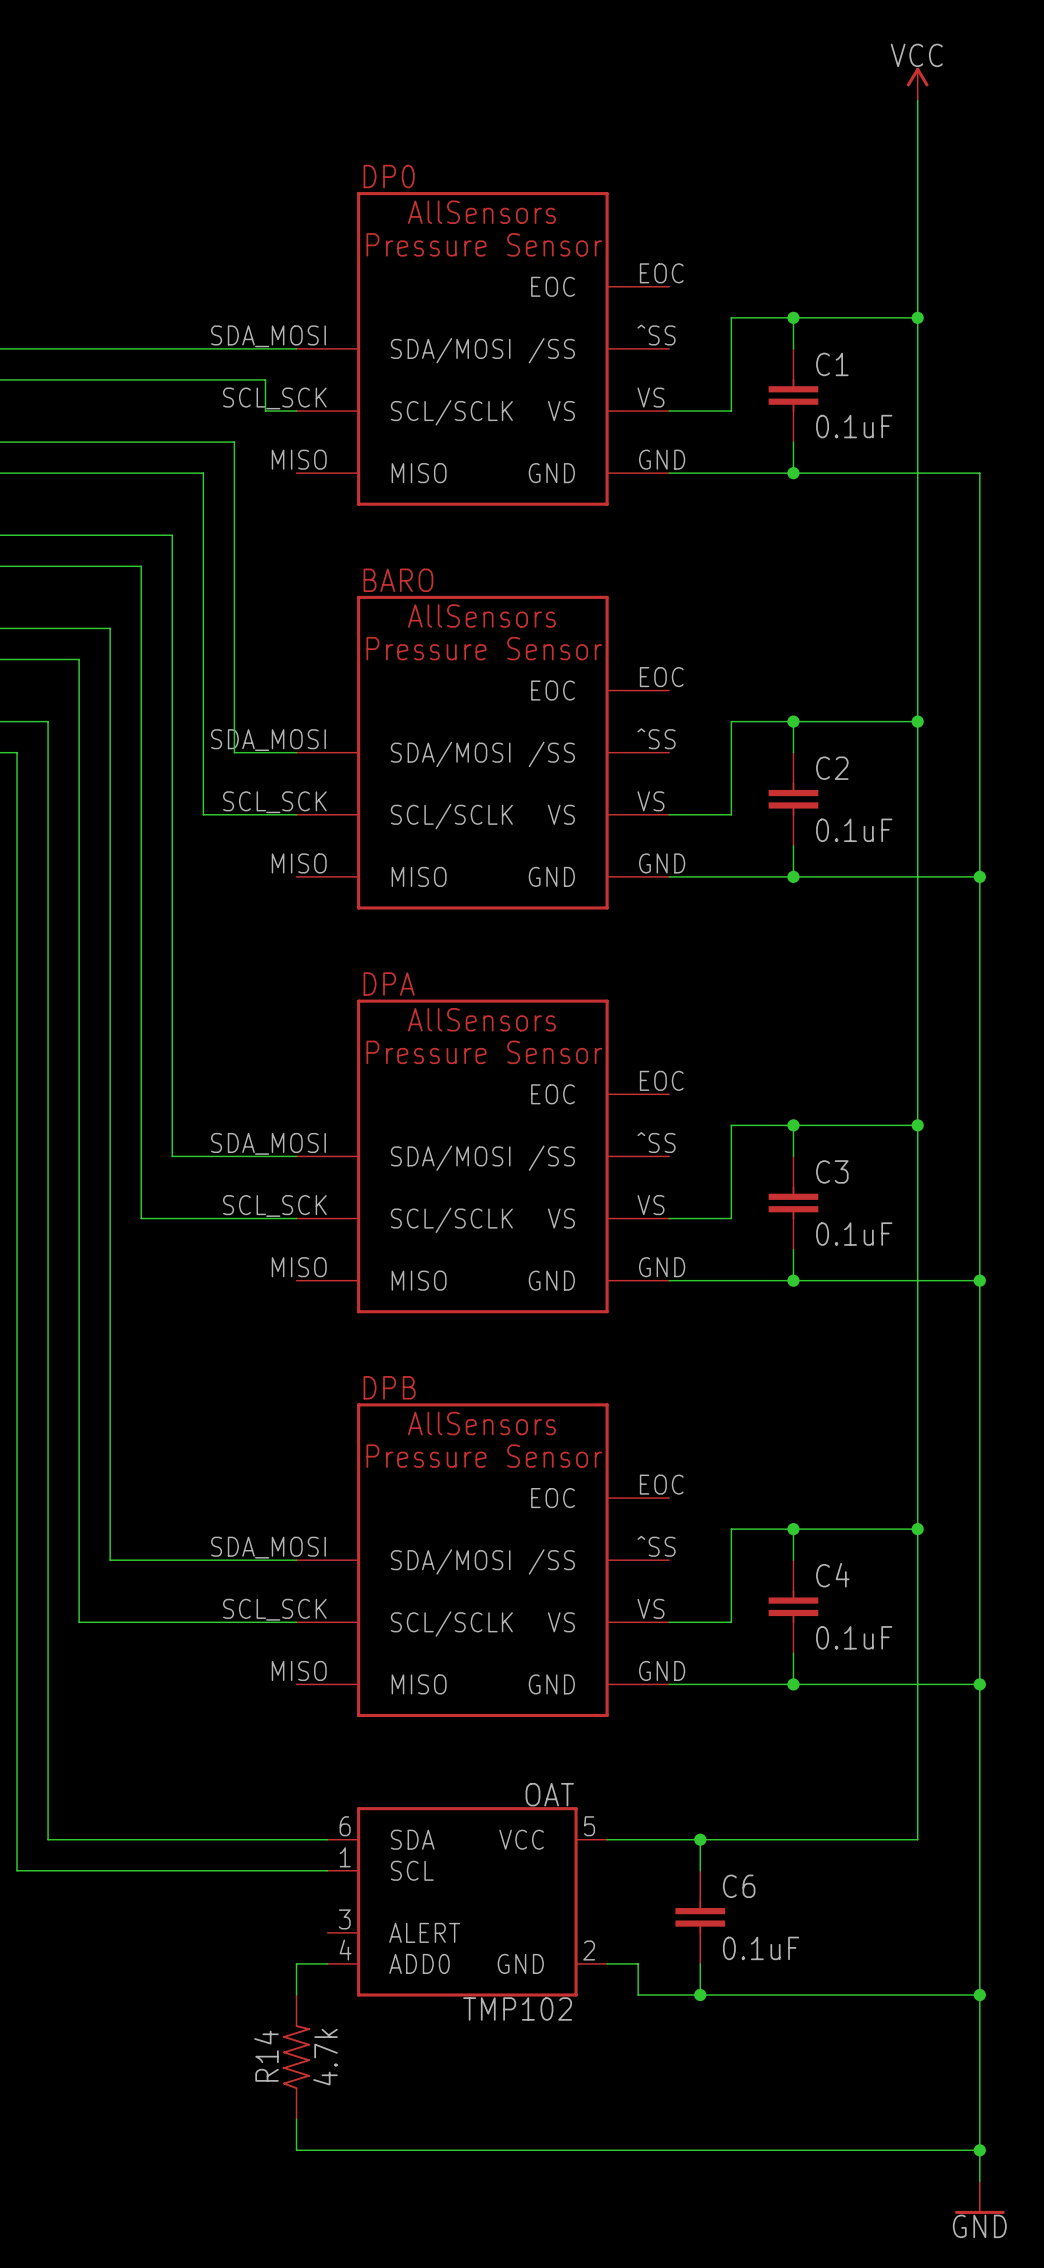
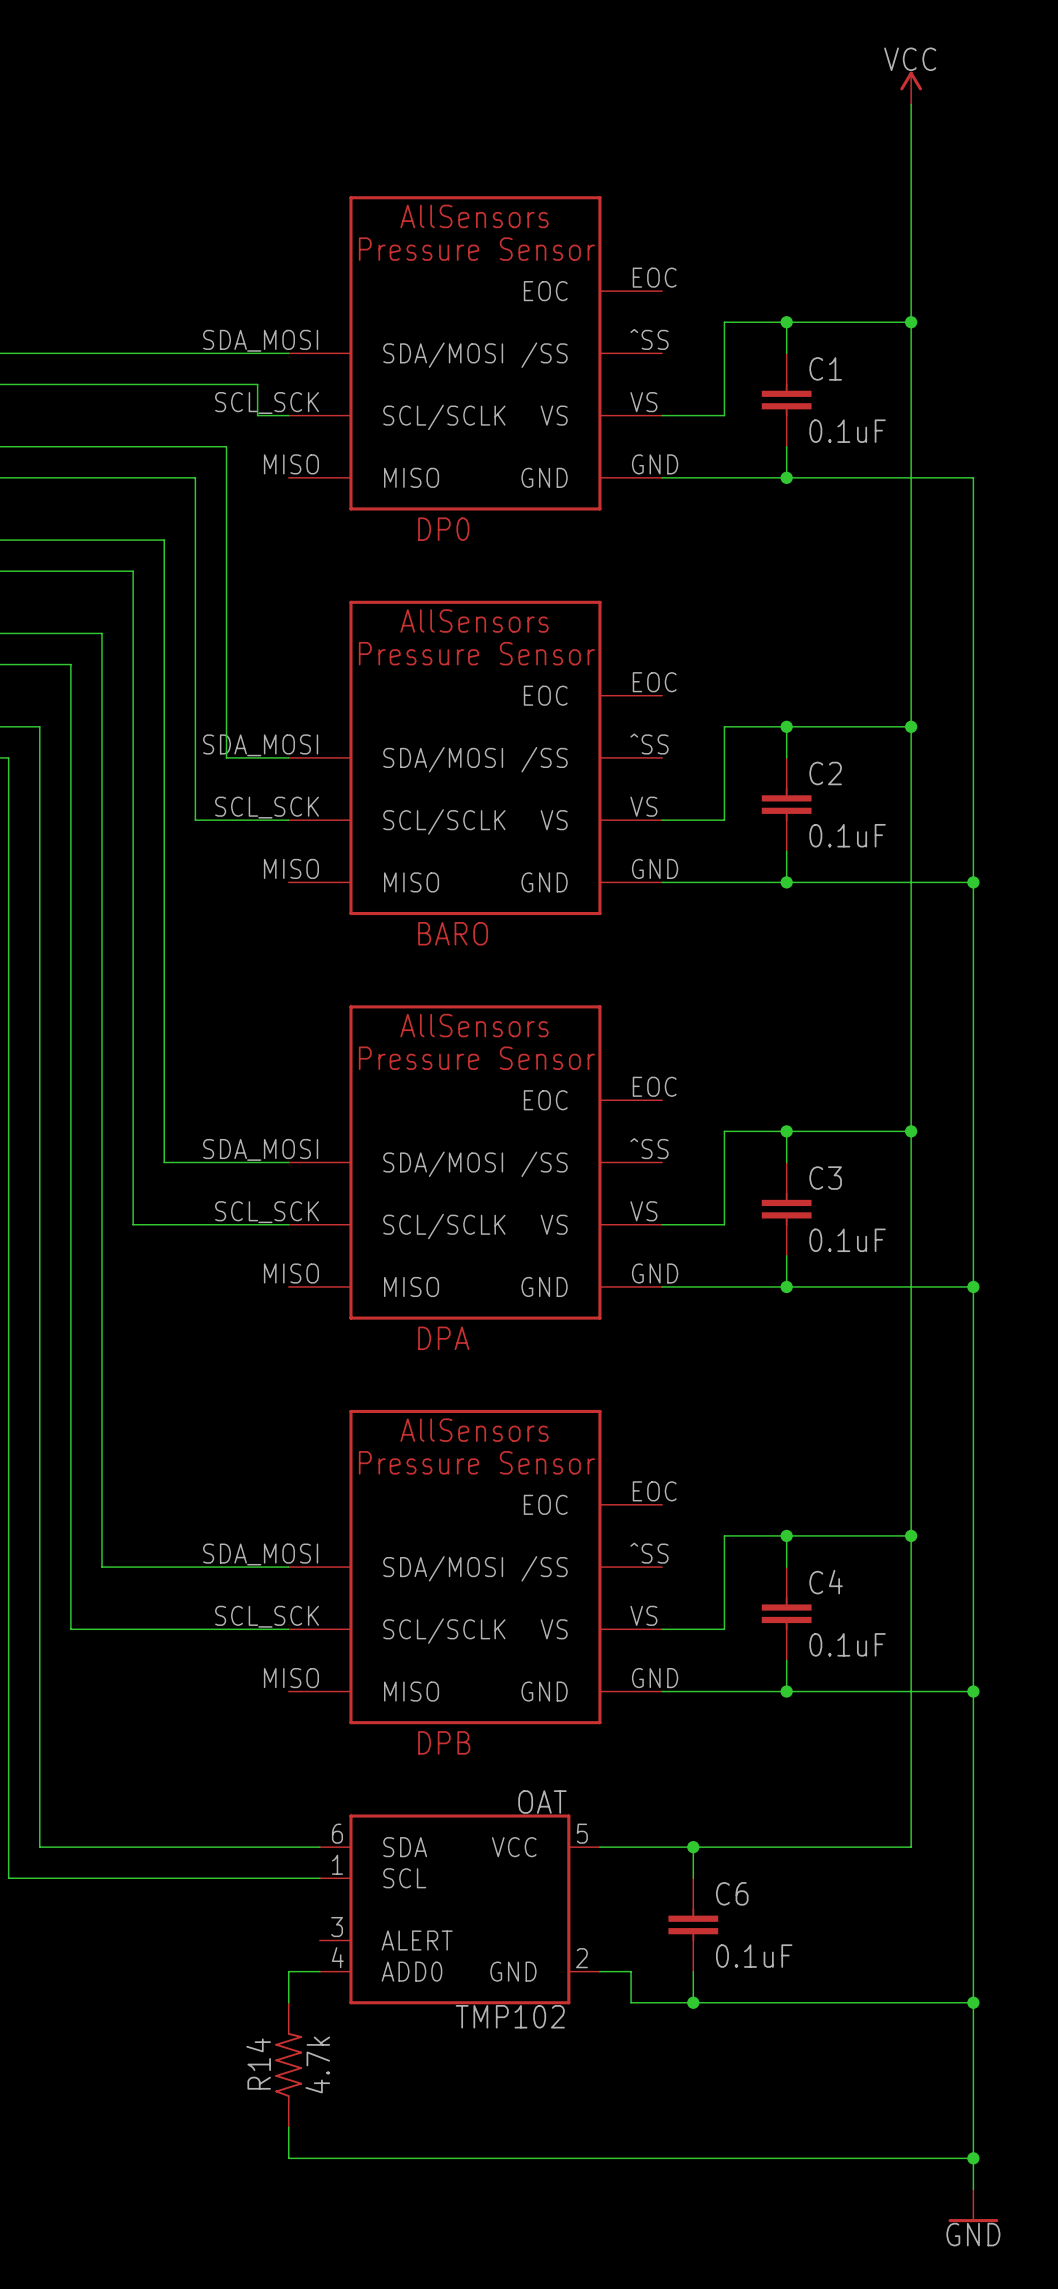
DP0 name position: DP0 (389, 176) -> DP0 (443, 529)
BARO name position: BARO (398, 580) -> BARO (453, 933)
DPA name position: DPA (389, 984) -> DPA (443, 1338)
DPB name position: DPB (389, 1387) -> DPB (444, 1742)

